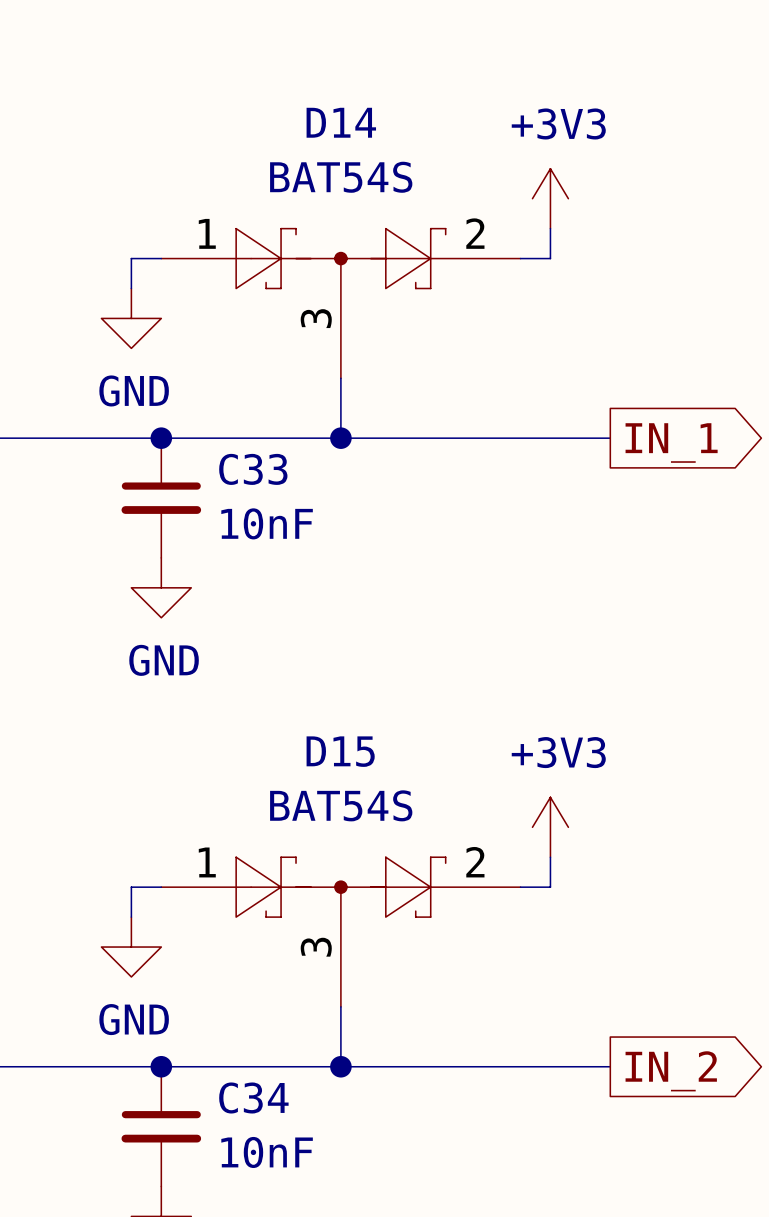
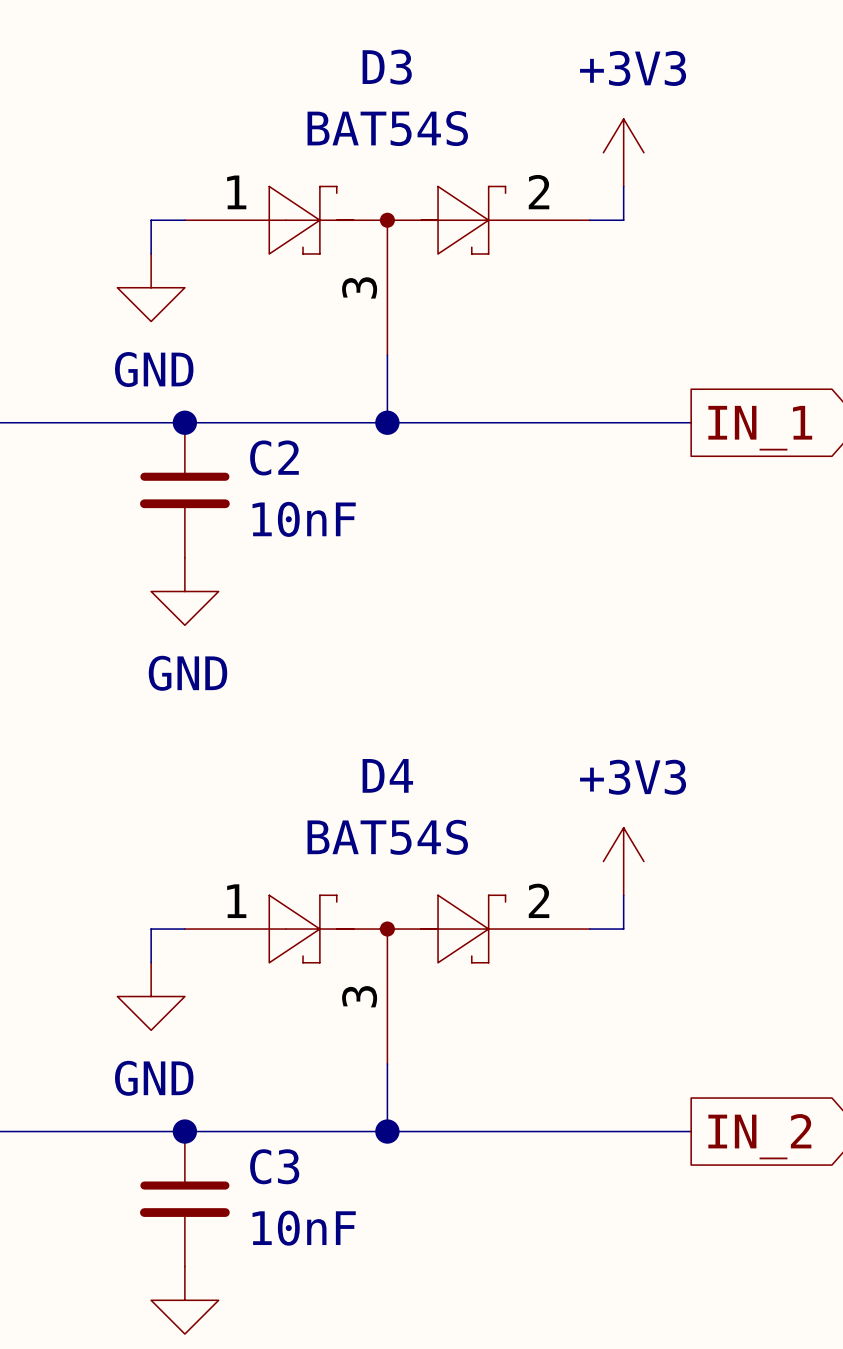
D14 name: D14 (341, 122) -> D3 (387, 67)
C33 name: C33 (253, 469) -> C2 (274, 457)
D15 name: D15 (340, 751) -> D4 (387, 775)
C34 name: C34 (253, 1097) -> C3 (274, 1166)

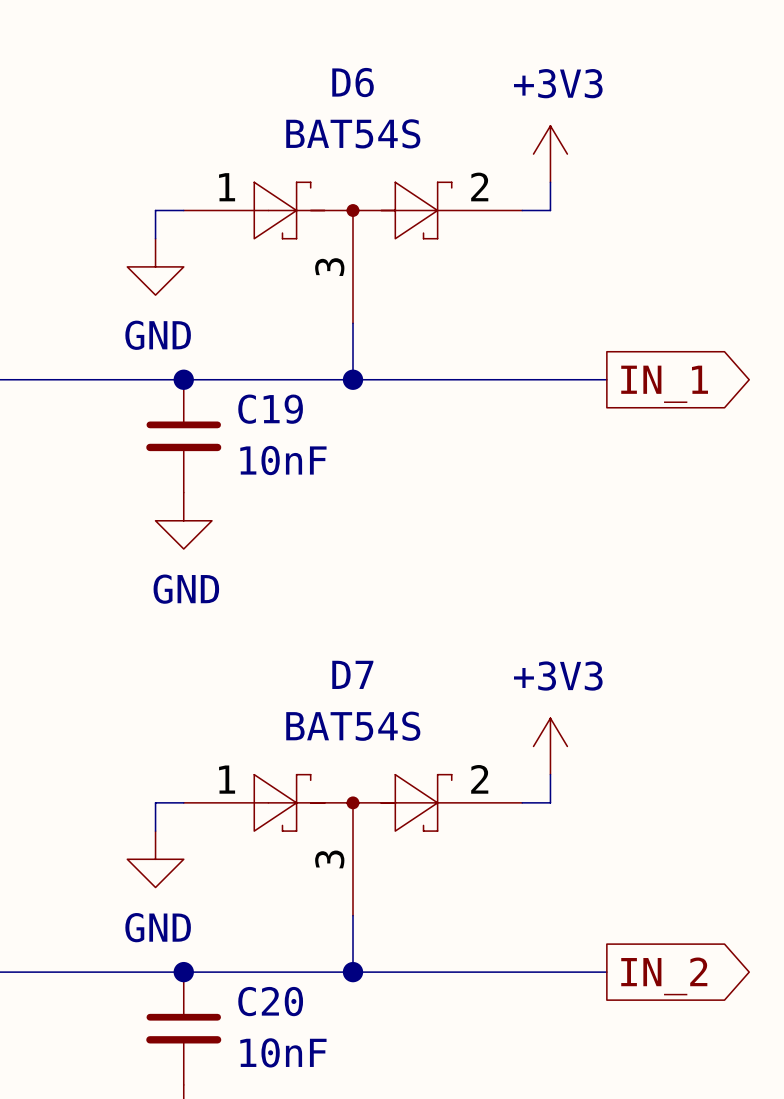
D3 name: D3 (387, 67) -> D6 (353, 82)
C2 name: C2 (274, 457) -> C19 (270, 409)
D4 name: D4 (387, 775) -> D7 (352, 674)
C3 name: C3 (274, 1166) -> C20 (270, 1001)

